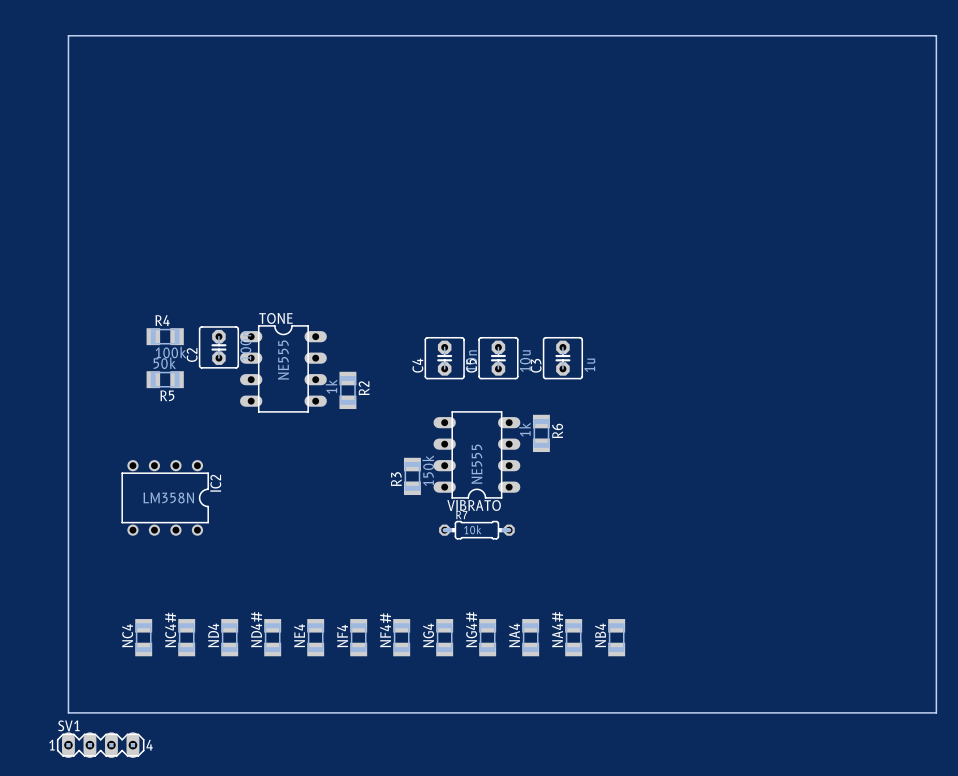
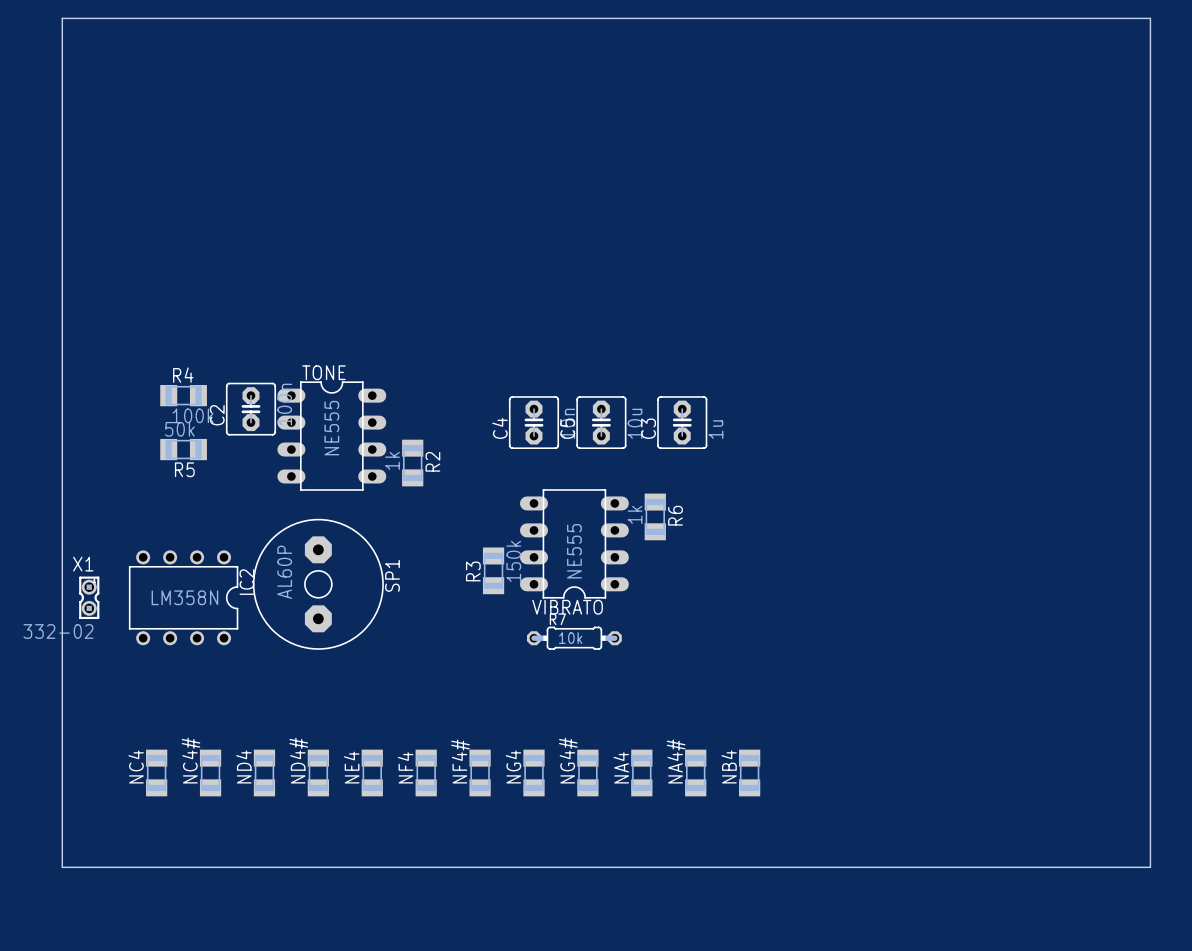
SP1: none -> AL60P (318, 584)
X1: none -> 332-02 (89, 597)
SV1: (100, 745) -> none

